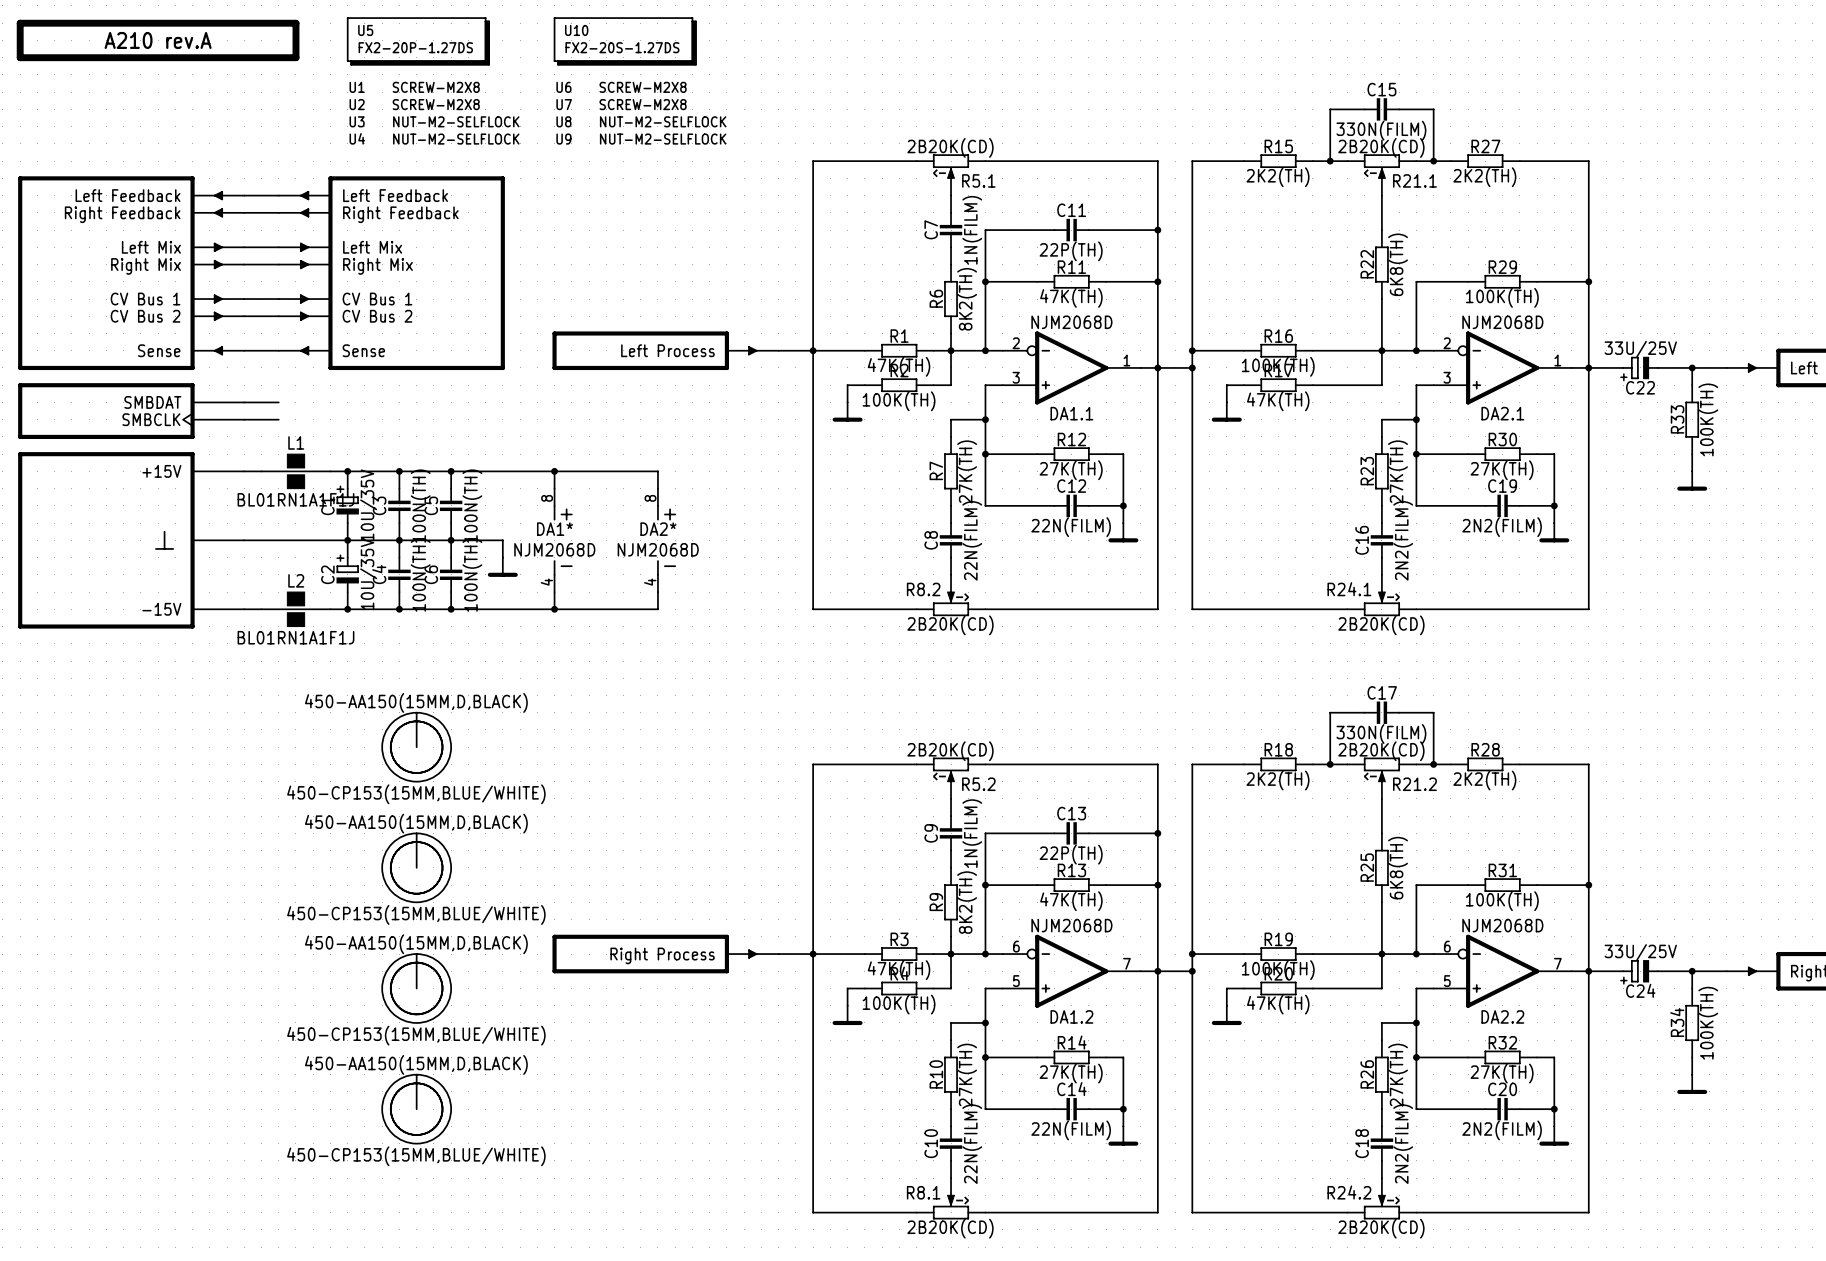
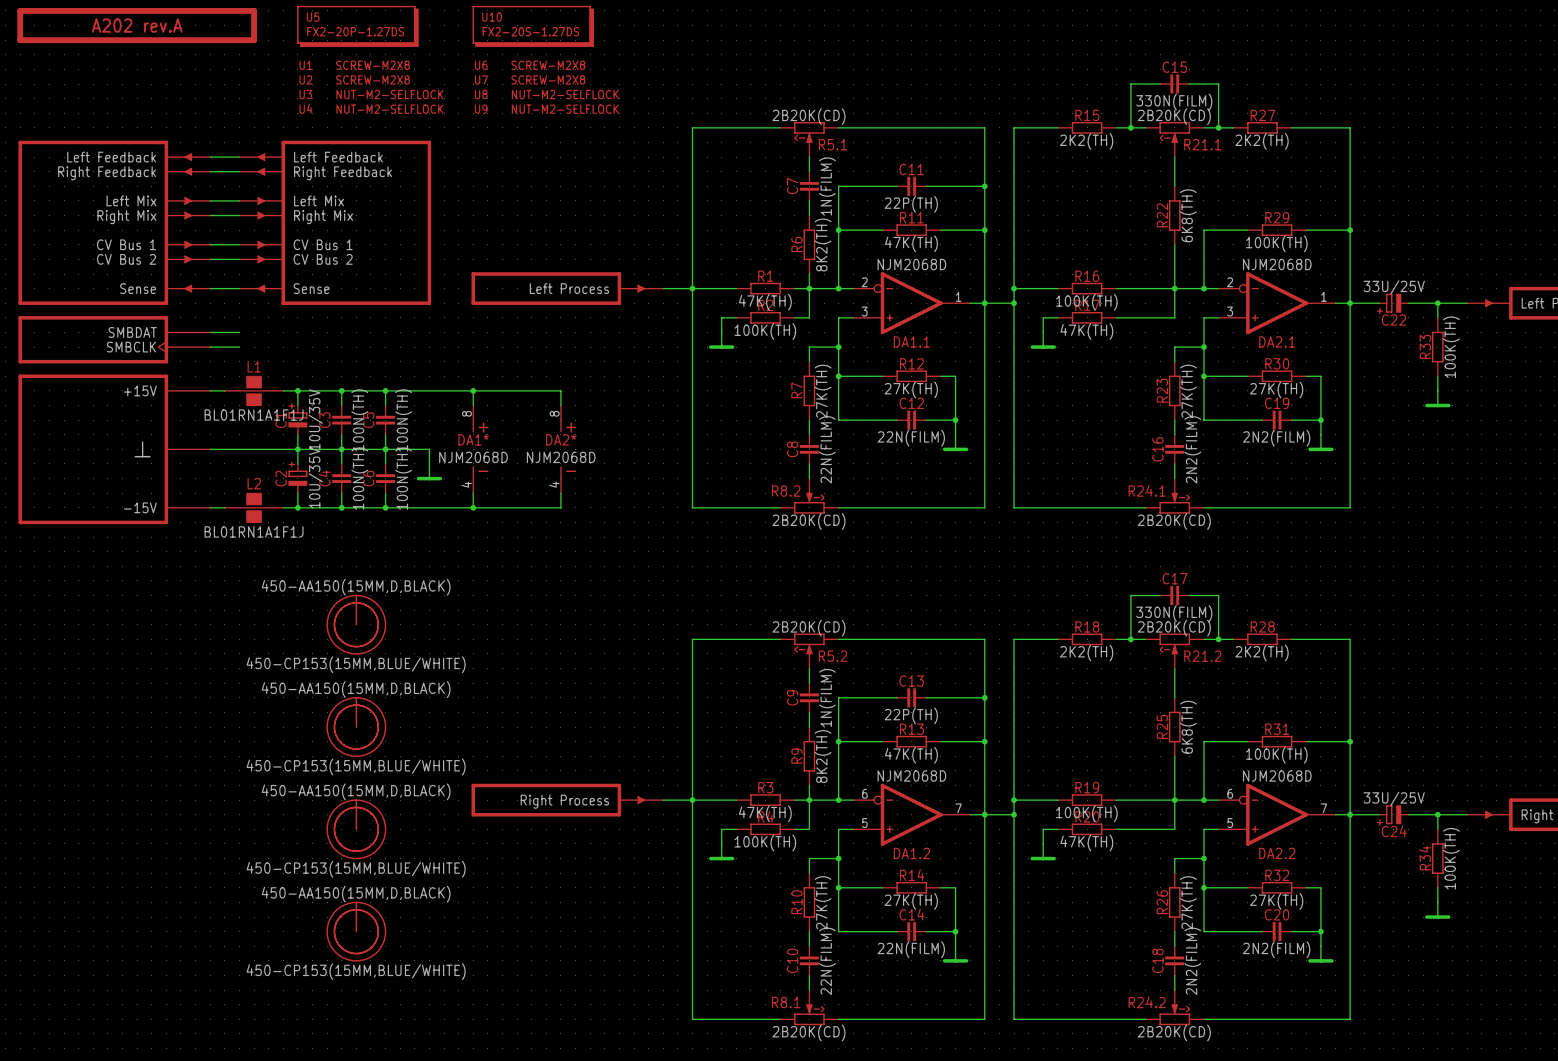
part value: A210 rev.A (158, 40) -> A202 rev.A (137, 25)

